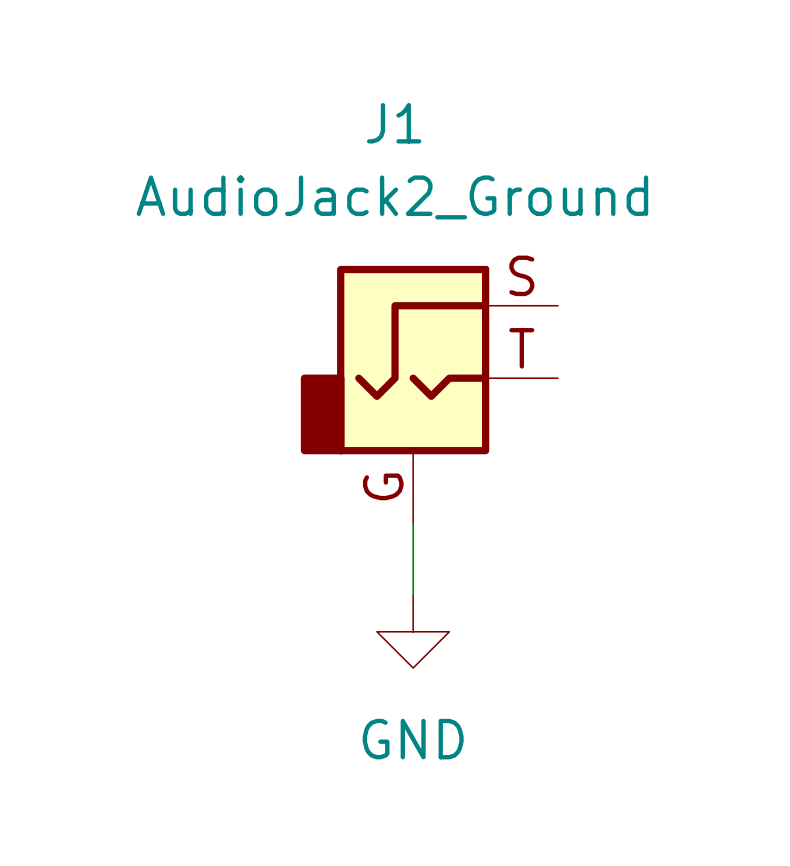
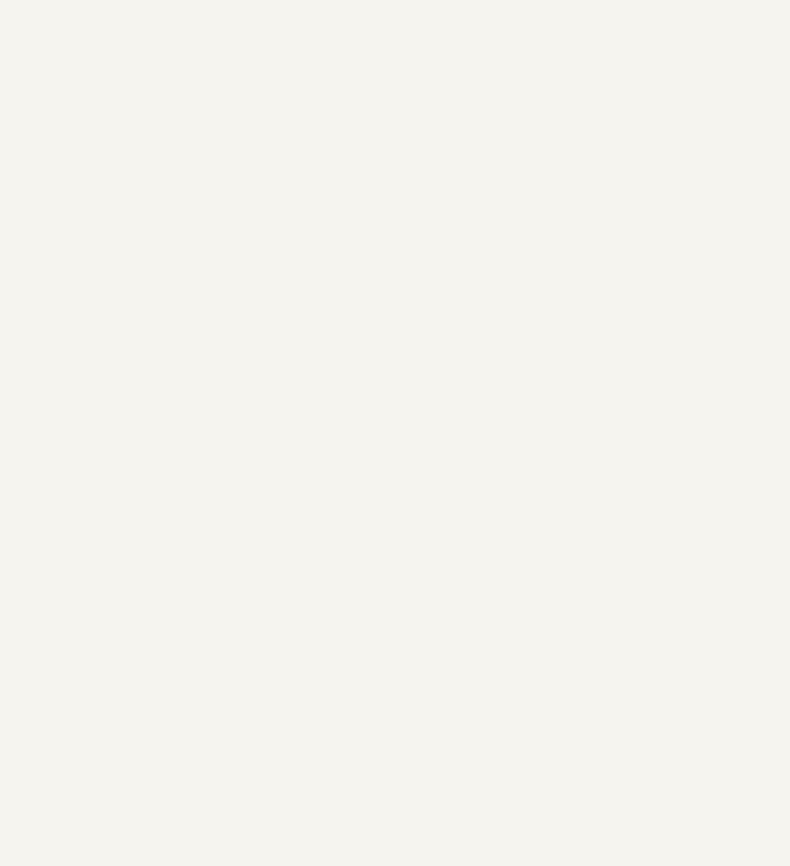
J1: AudioJack2_Ground (429, 394) -> none
wire: (413, 523) (413, 595) -> none
power symbol: GND (413, 631) -> none

